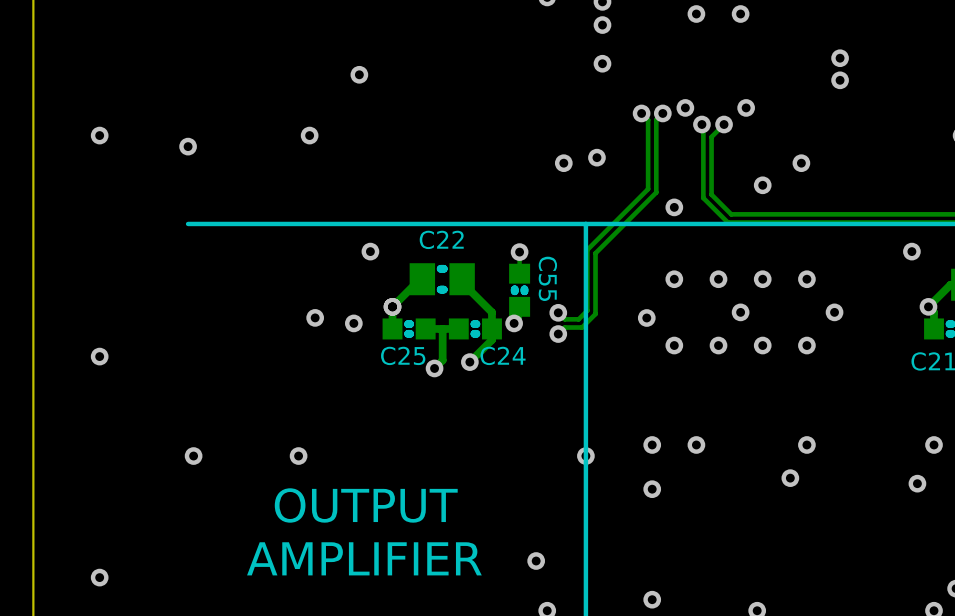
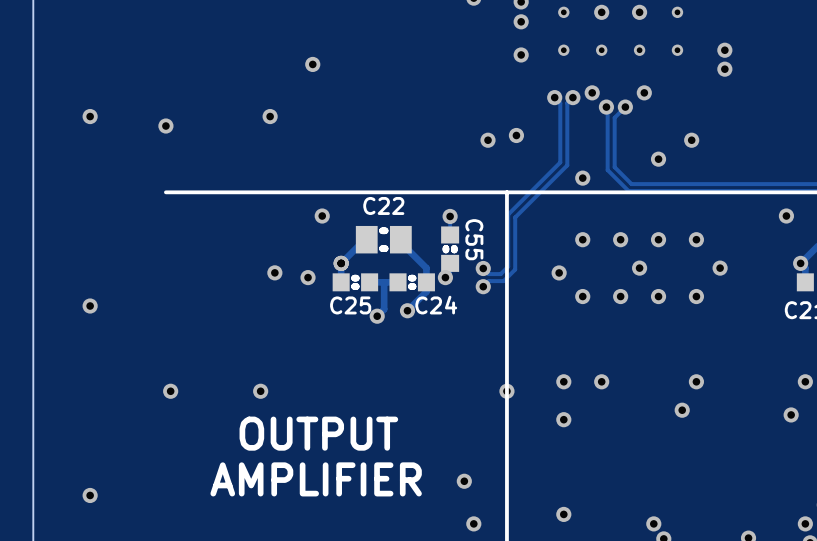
via: none -> (563, 12)
via: none -> (677, 12)
via: none -> (563, 50)
via: none -> (601, 50)
via: none -> (639, 50)
via: none -> (677, 50)

